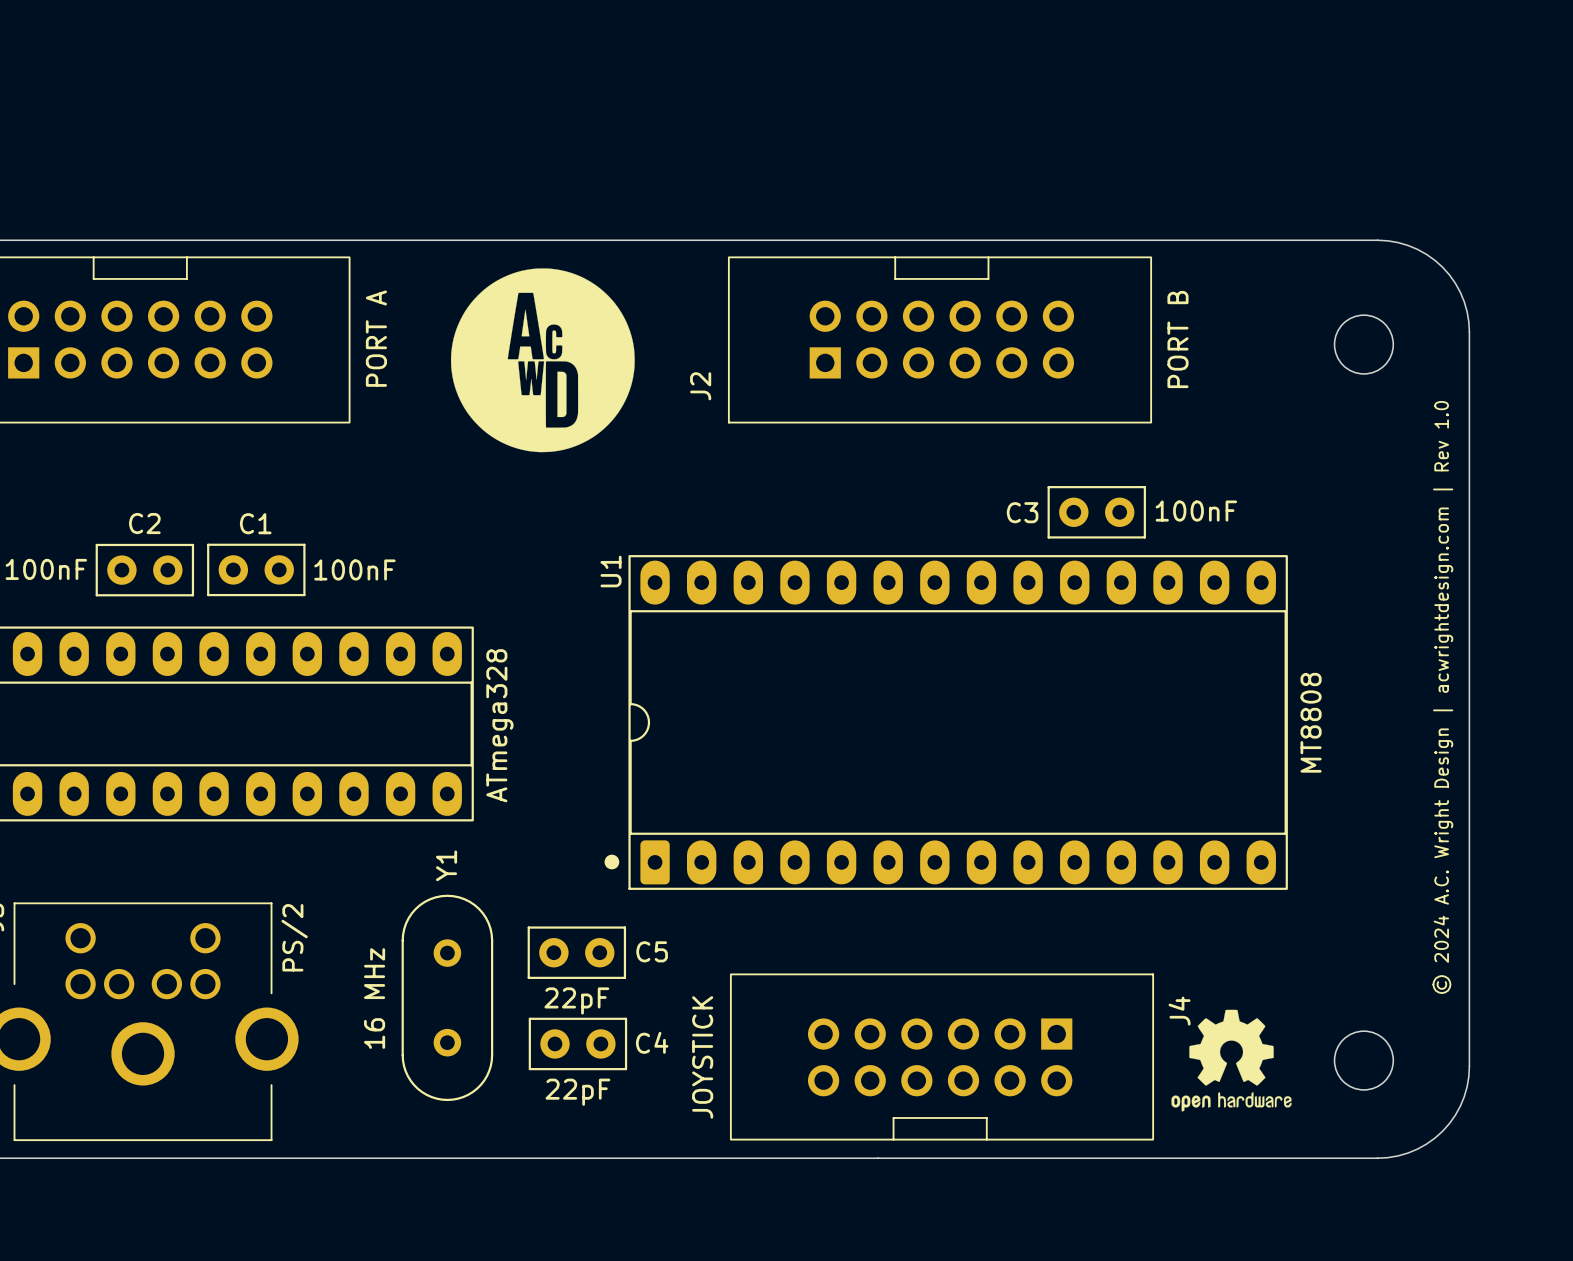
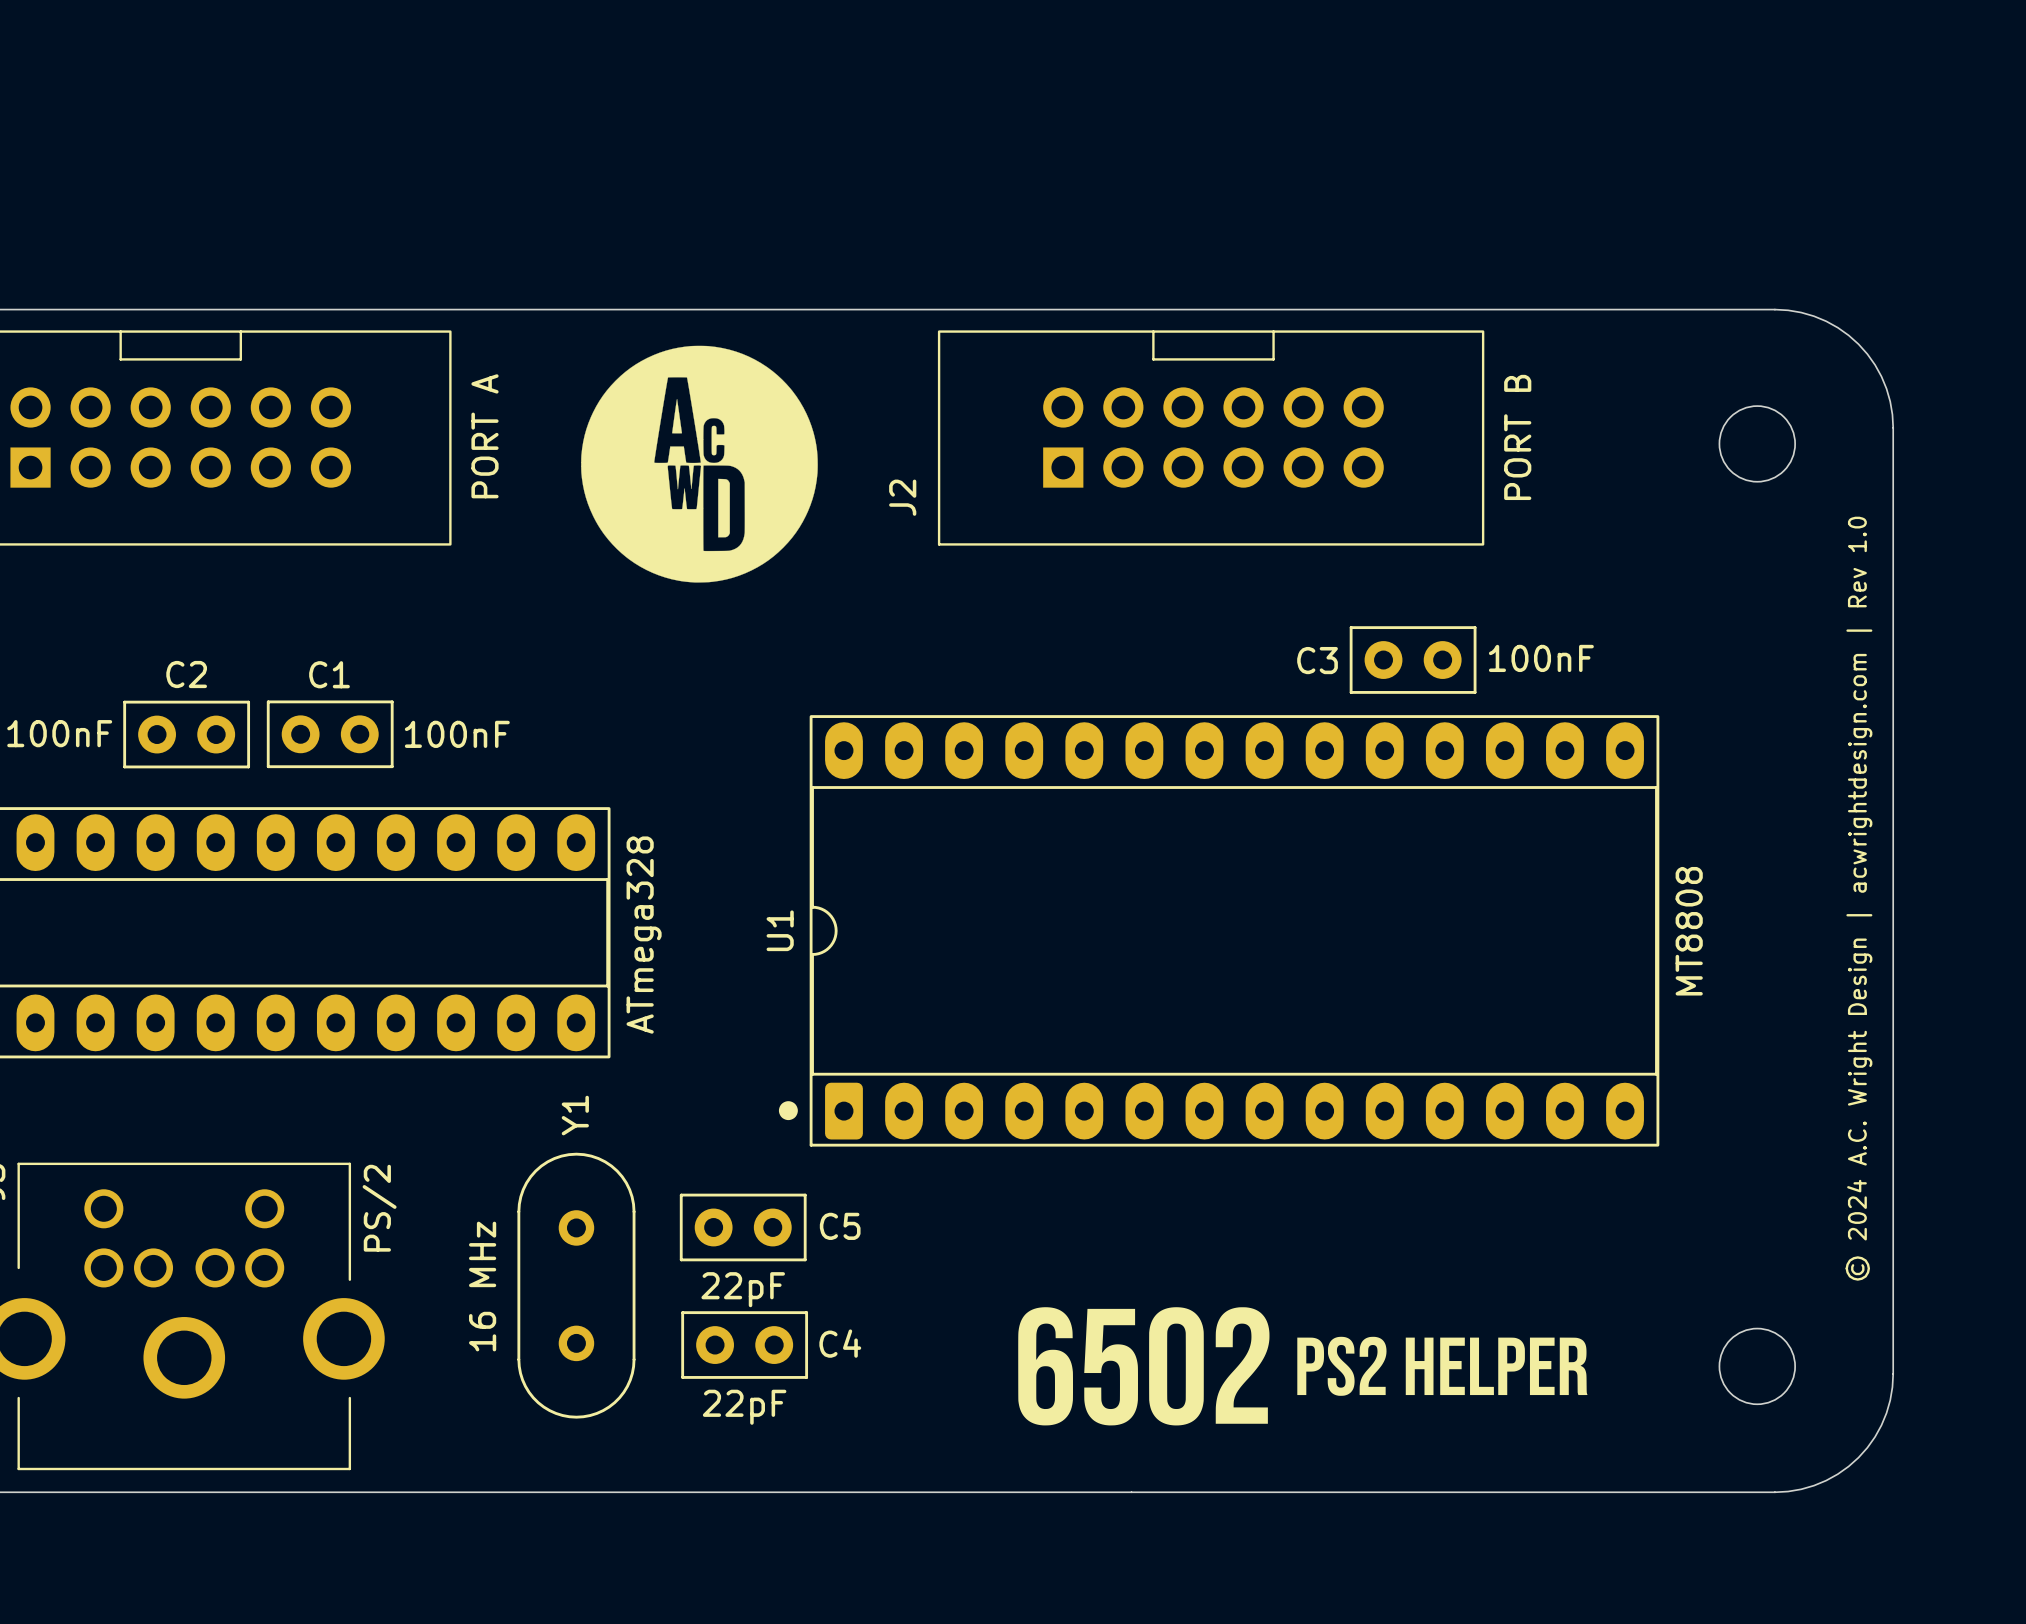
U1 name position: U1 (611, 571) -> U1 (780, 930)
drawing: [1171, 1009, 1292, 1112] -> none
drawing: none -> [1018, 1307, 1588, 1426]
J4: JOYSTICK (942, 1056) -> none

